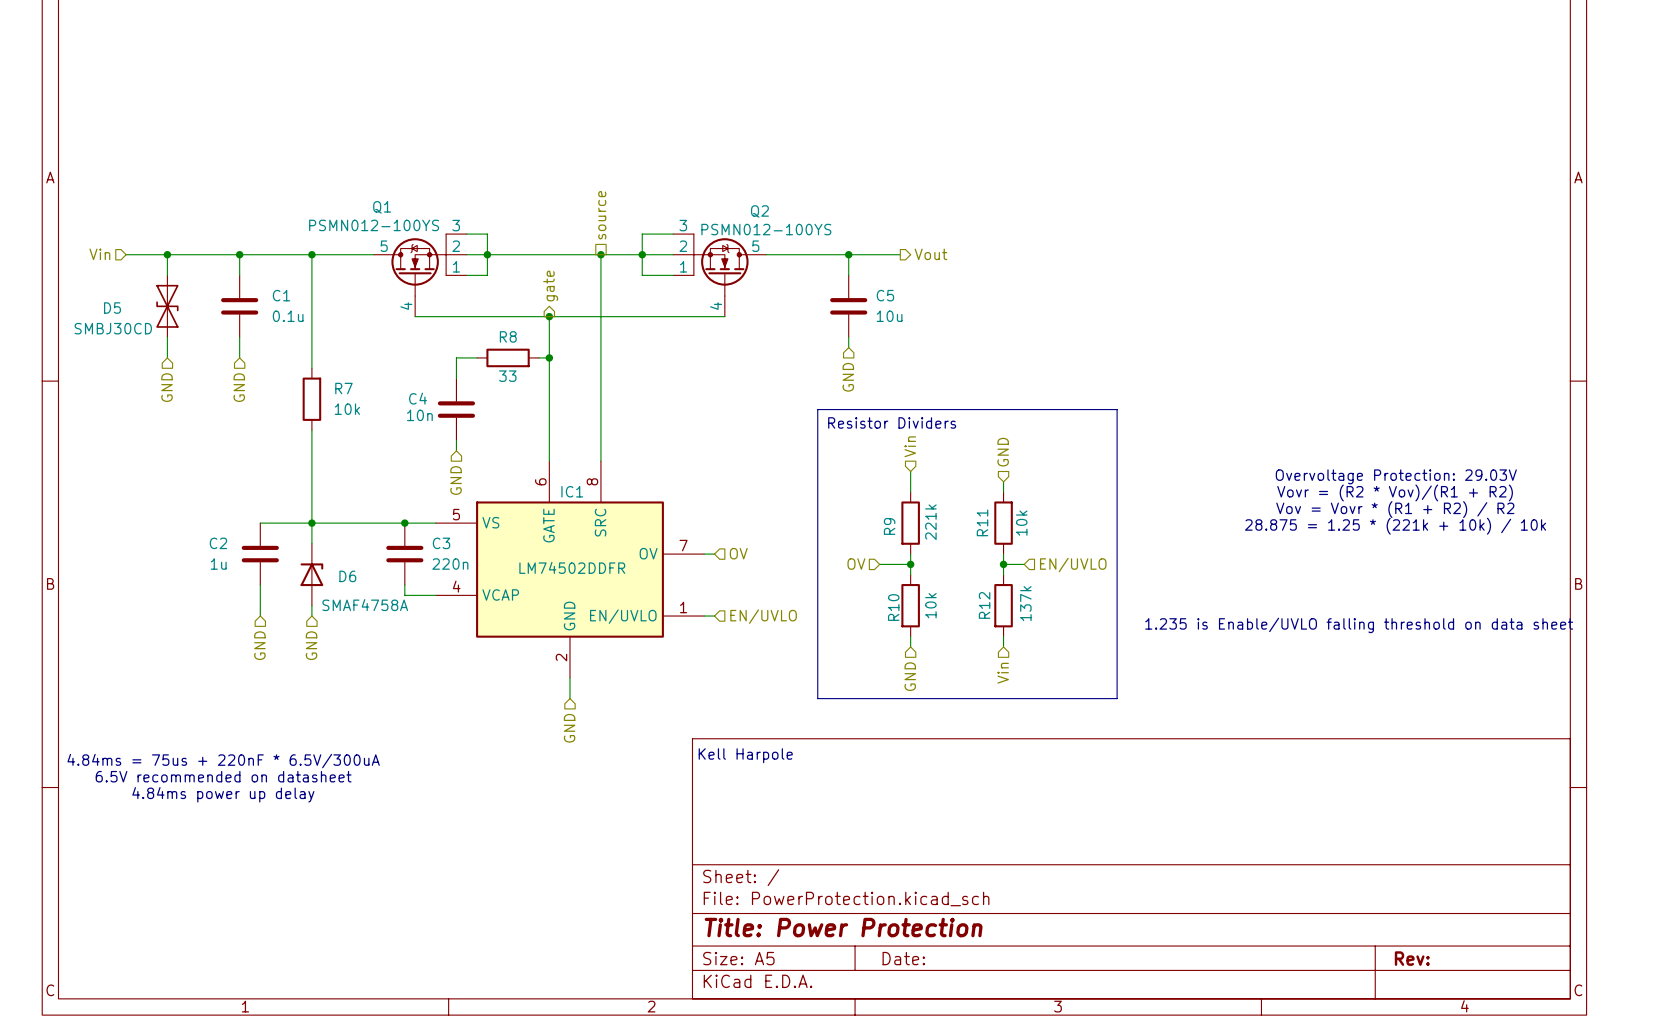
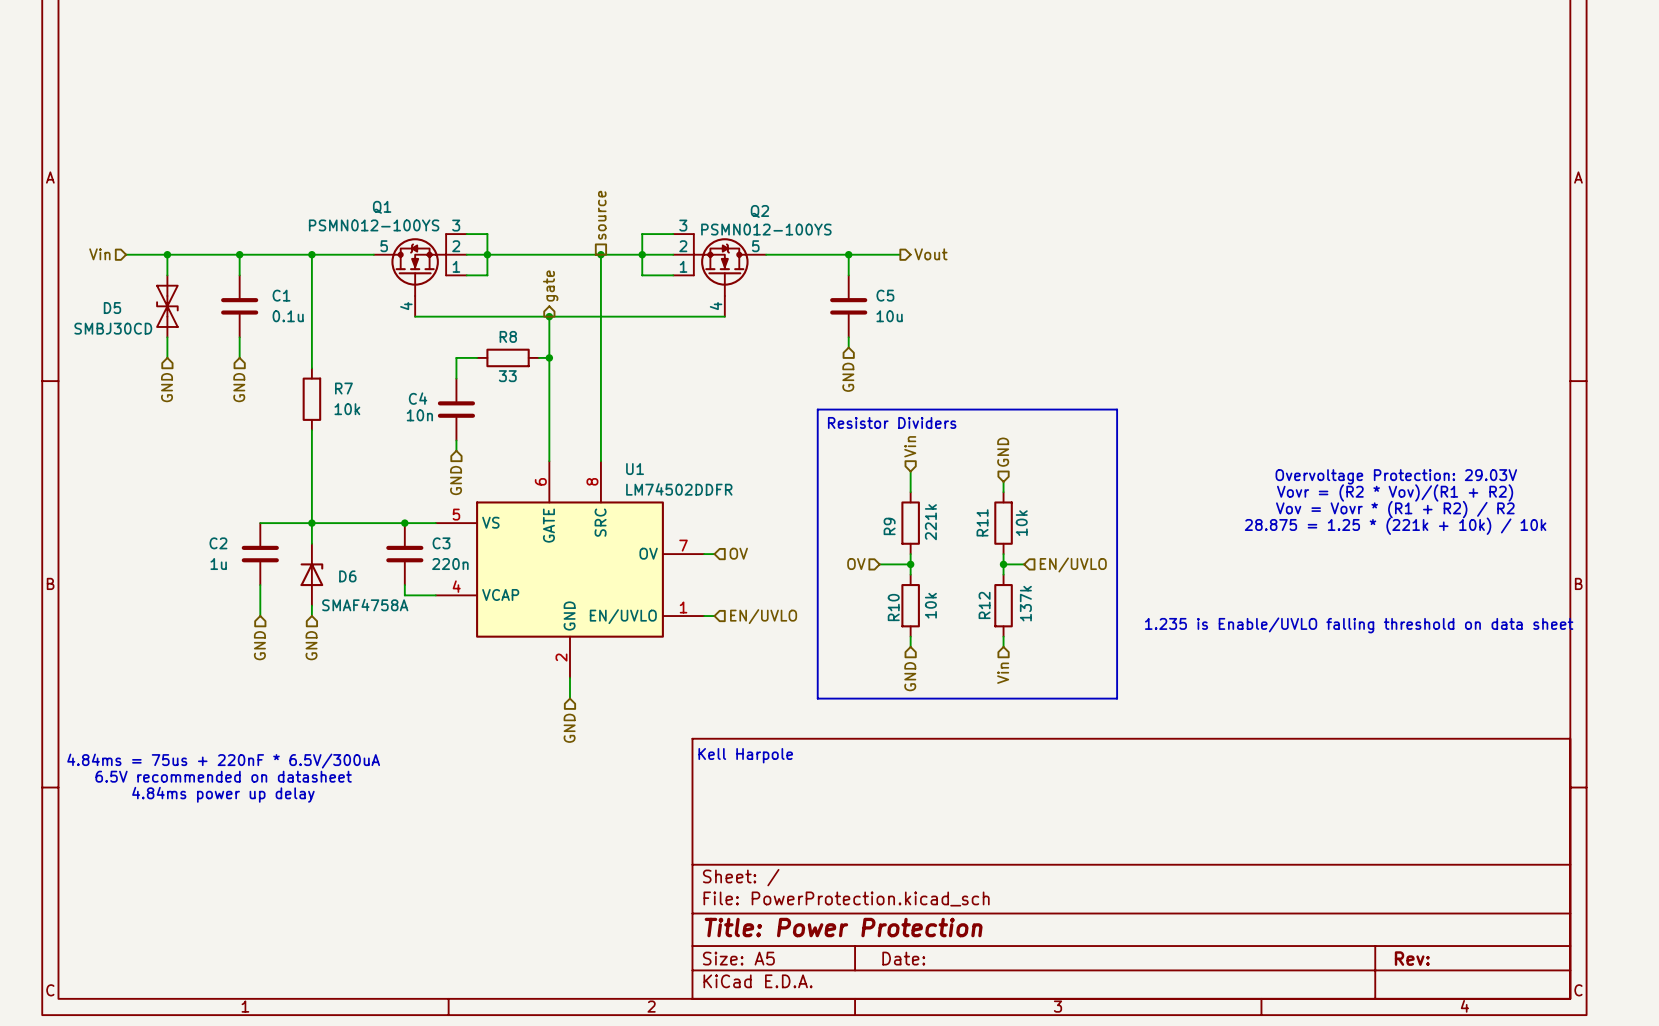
IC1 name: IC1 (572, 491) -> U1 (635, 469)
IC1 value position: LM74502DDFR (572, 567) -> LM74502DDFR (679, 489)

